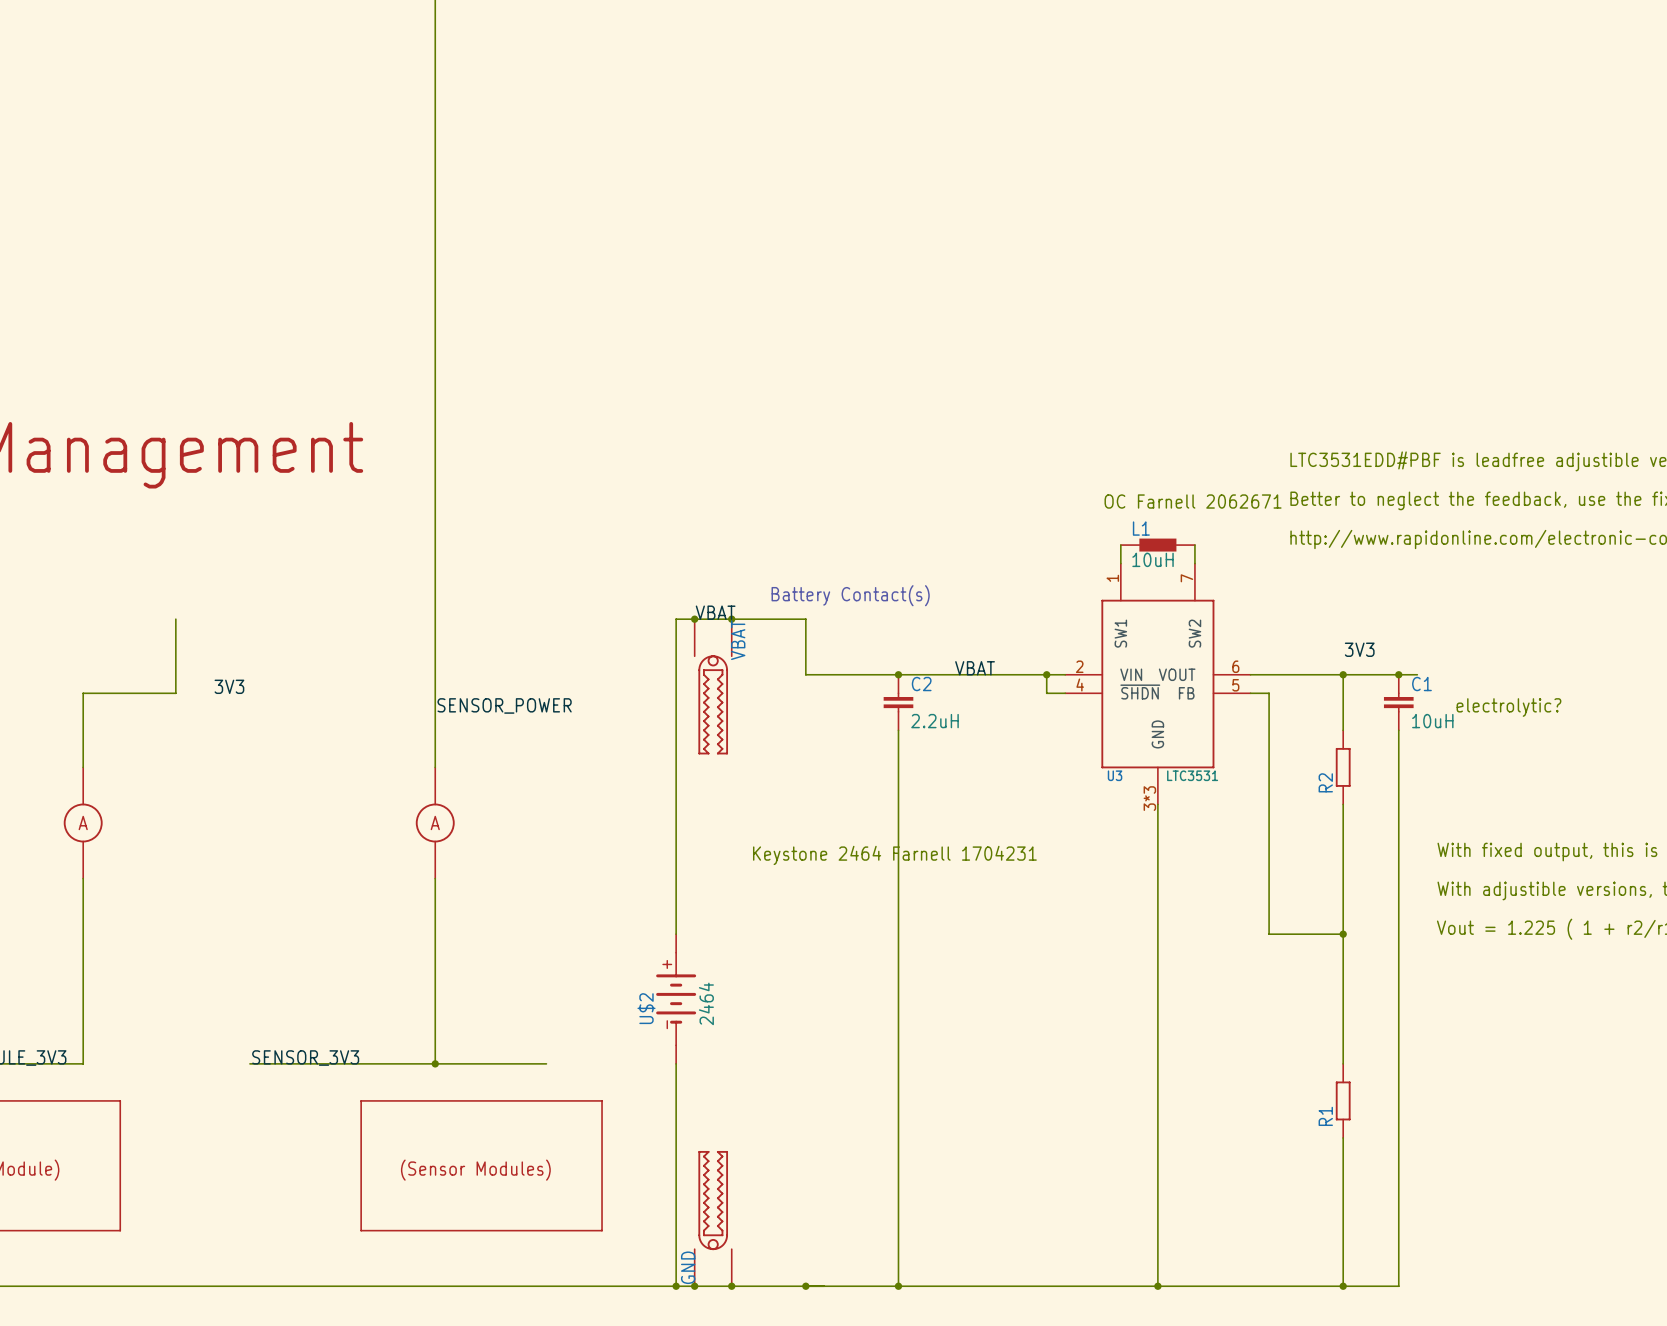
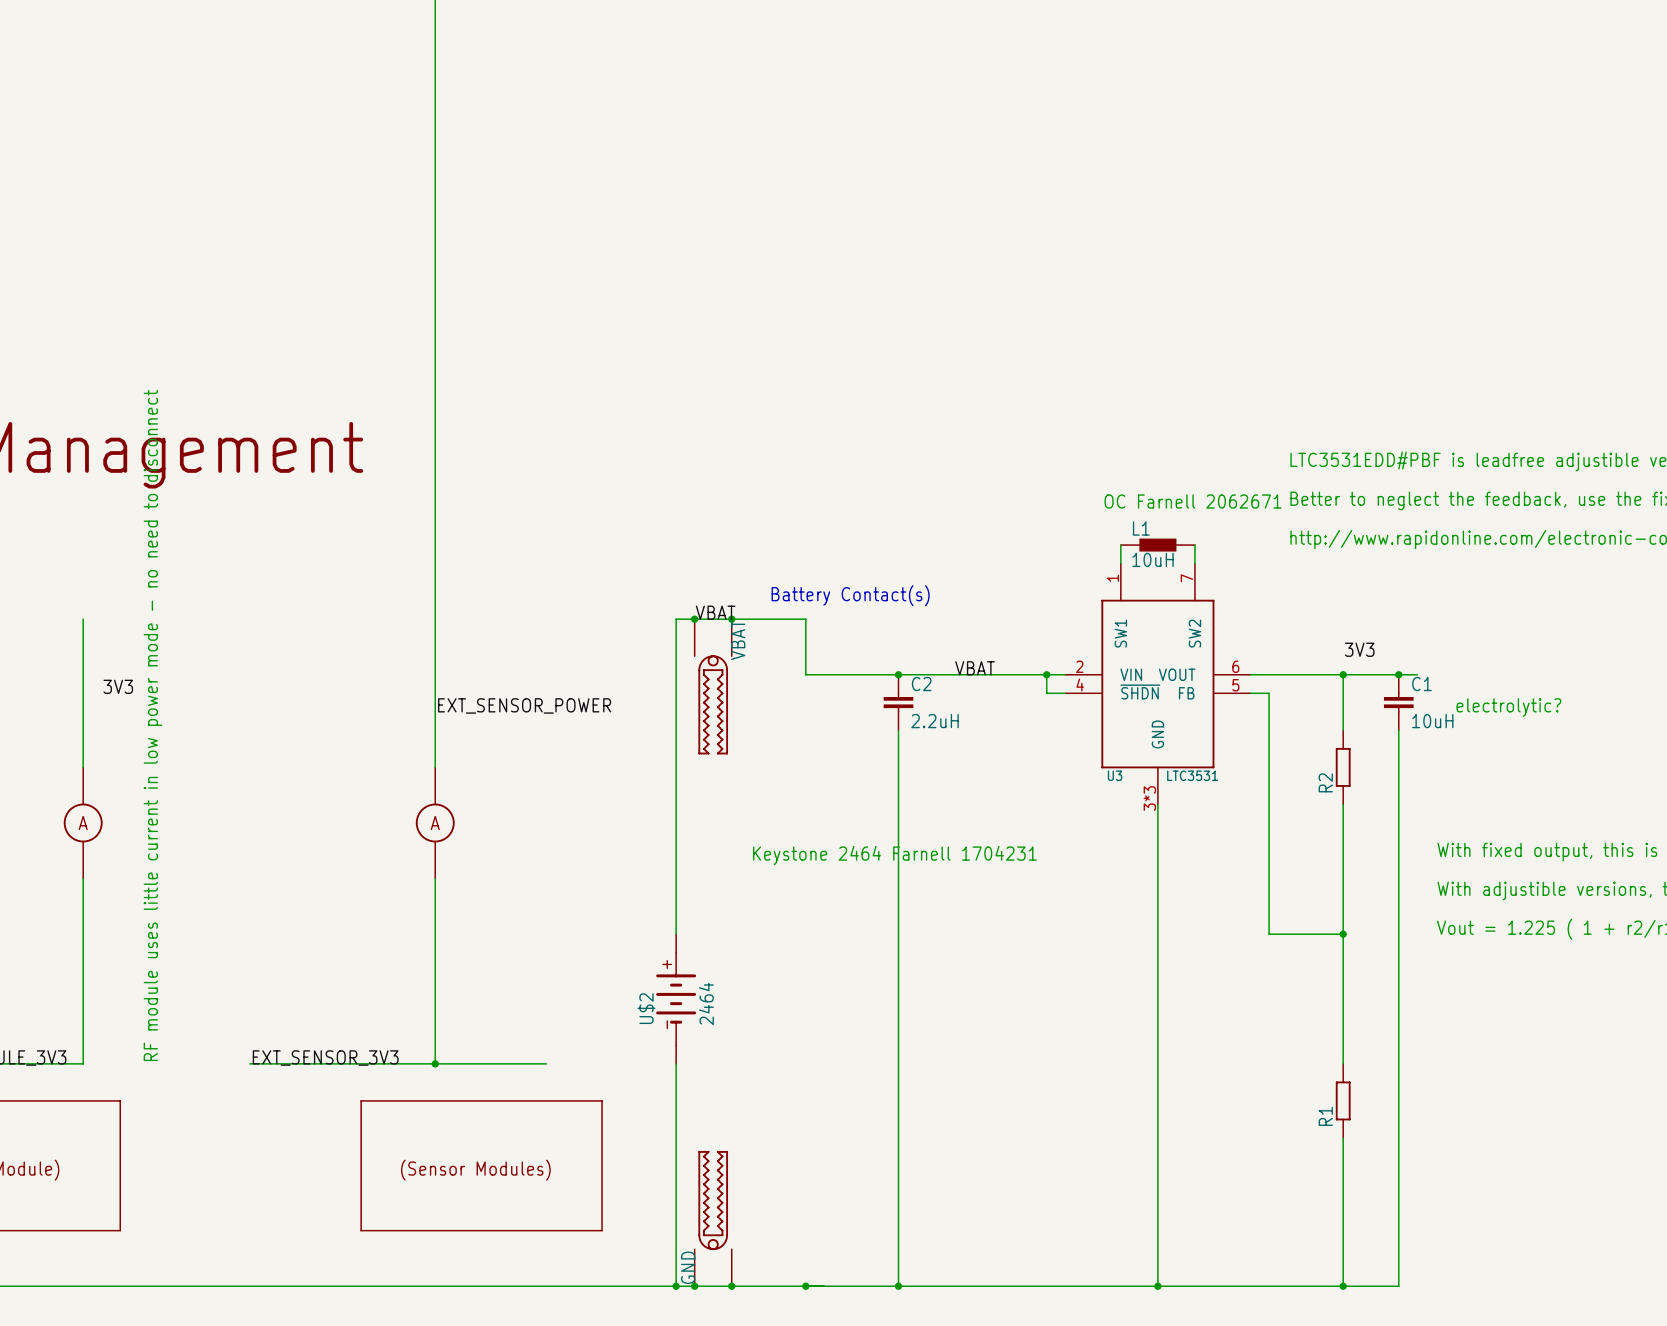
wire: (175, 619) (175, 693) (83, 693) -> (83, 619) (83, 693)
label position: 3V3 (229, 686) -> 3V3 (118, 686)
label: SENSOR_POWER (504, 705) -> EXT_SENSOR_POWER (524, 705)
text: none -> RF module uses little current in low power mode - no need to disconnect (152, 725)
label: SENSOR_3V3 (305, 1058) -> EXT_SENSOR_3V3 (325, 1058)

